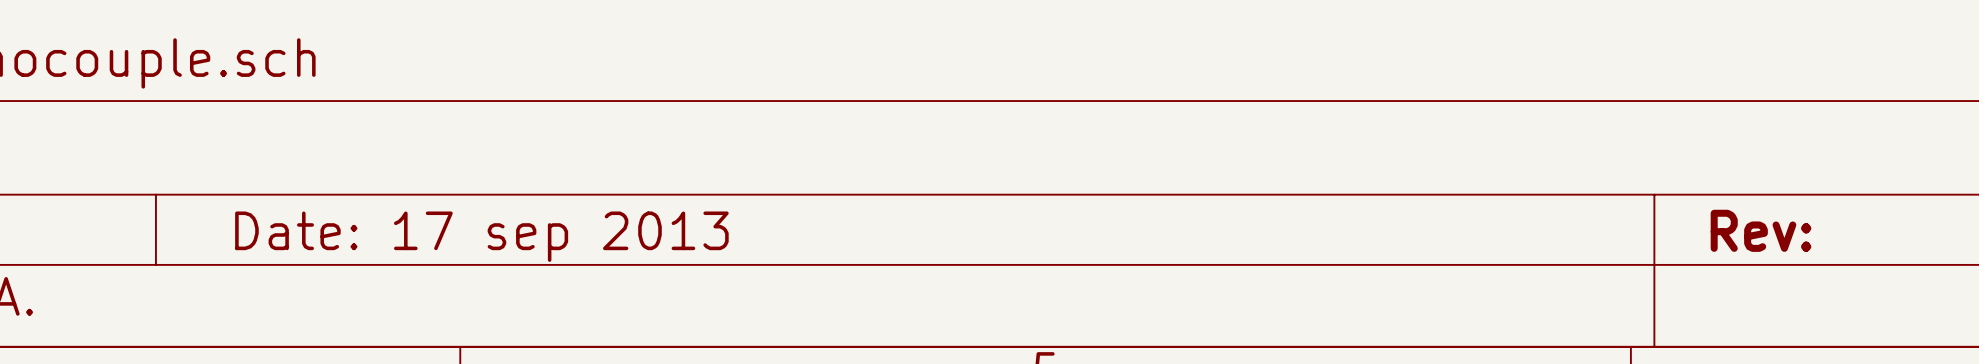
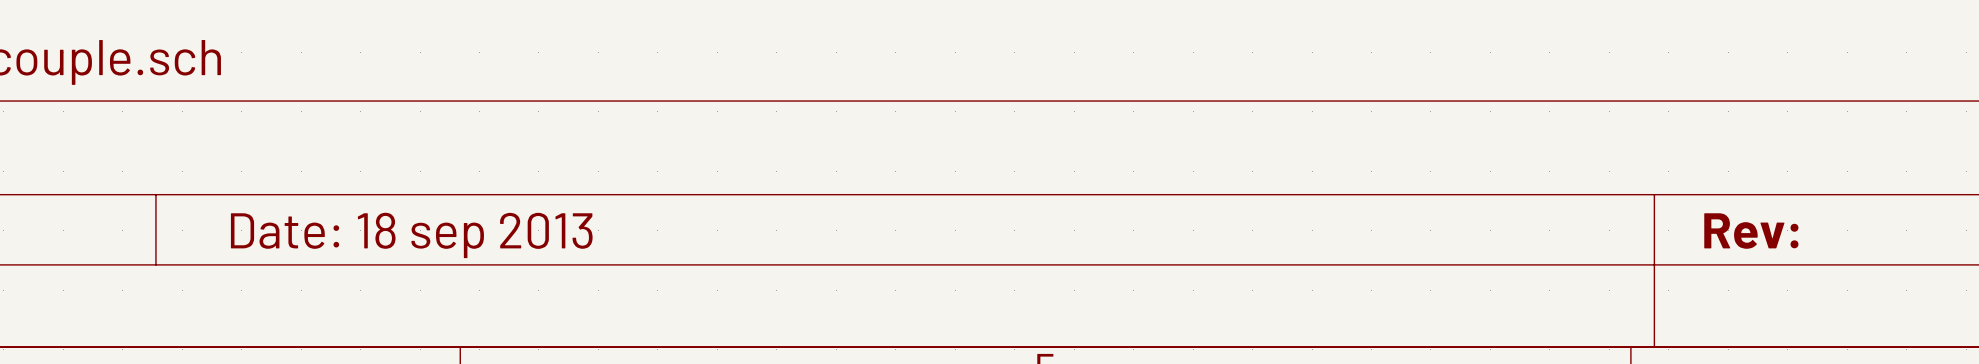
title block: Date: 17 sep 2013 (481, 236) -> Date: 18 sep 2013 (411, 235)

